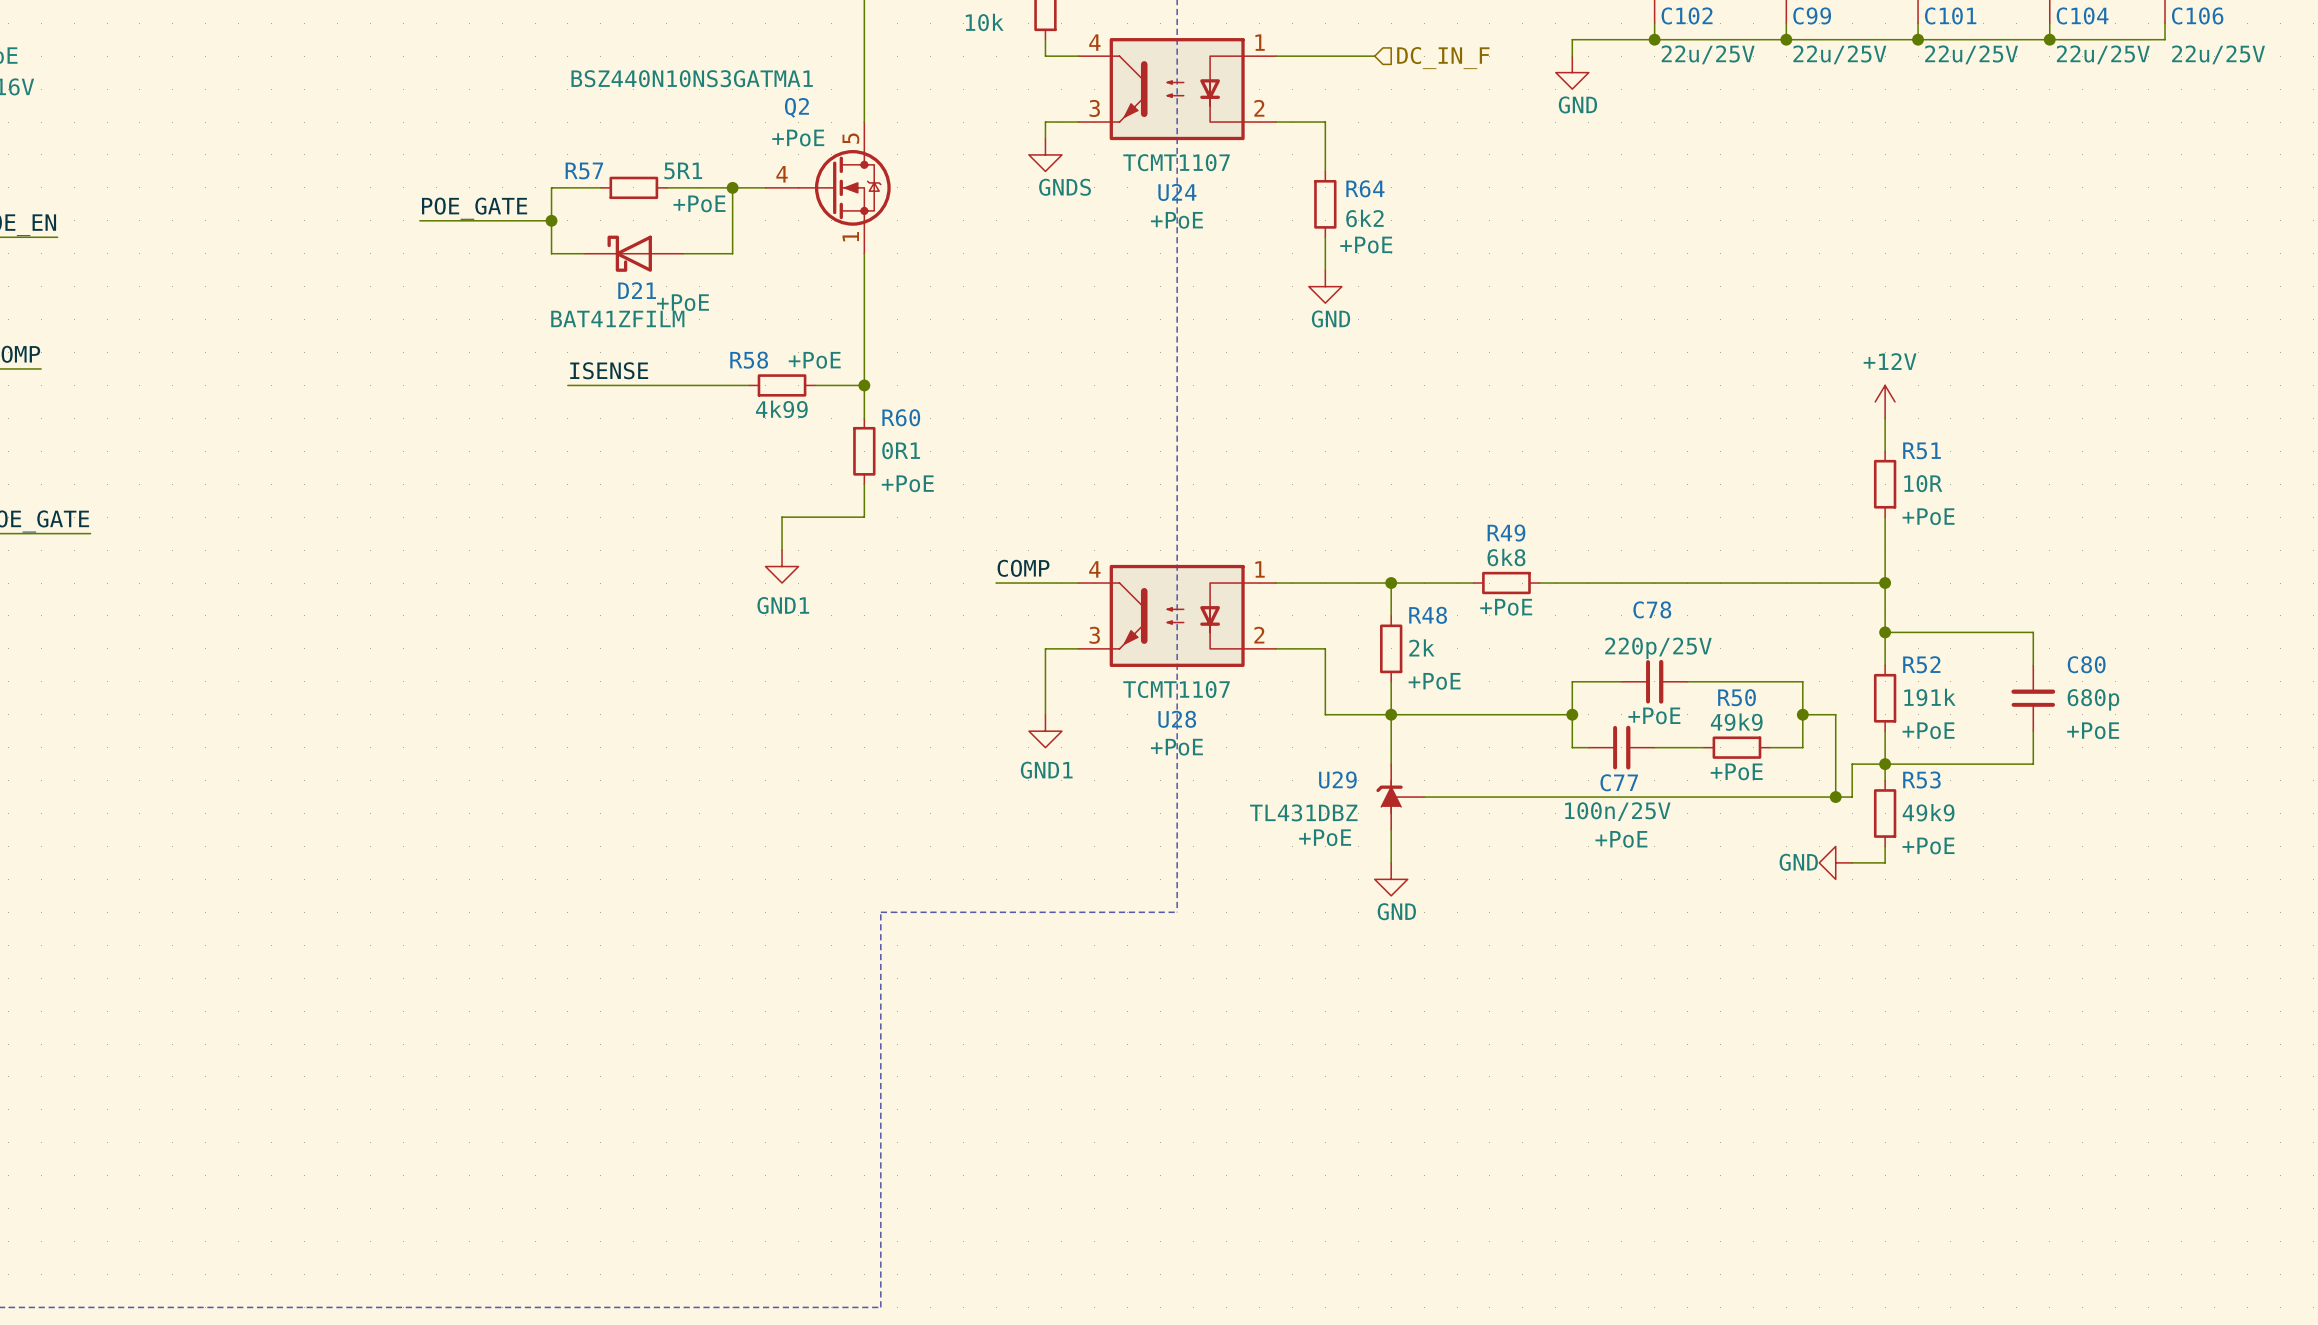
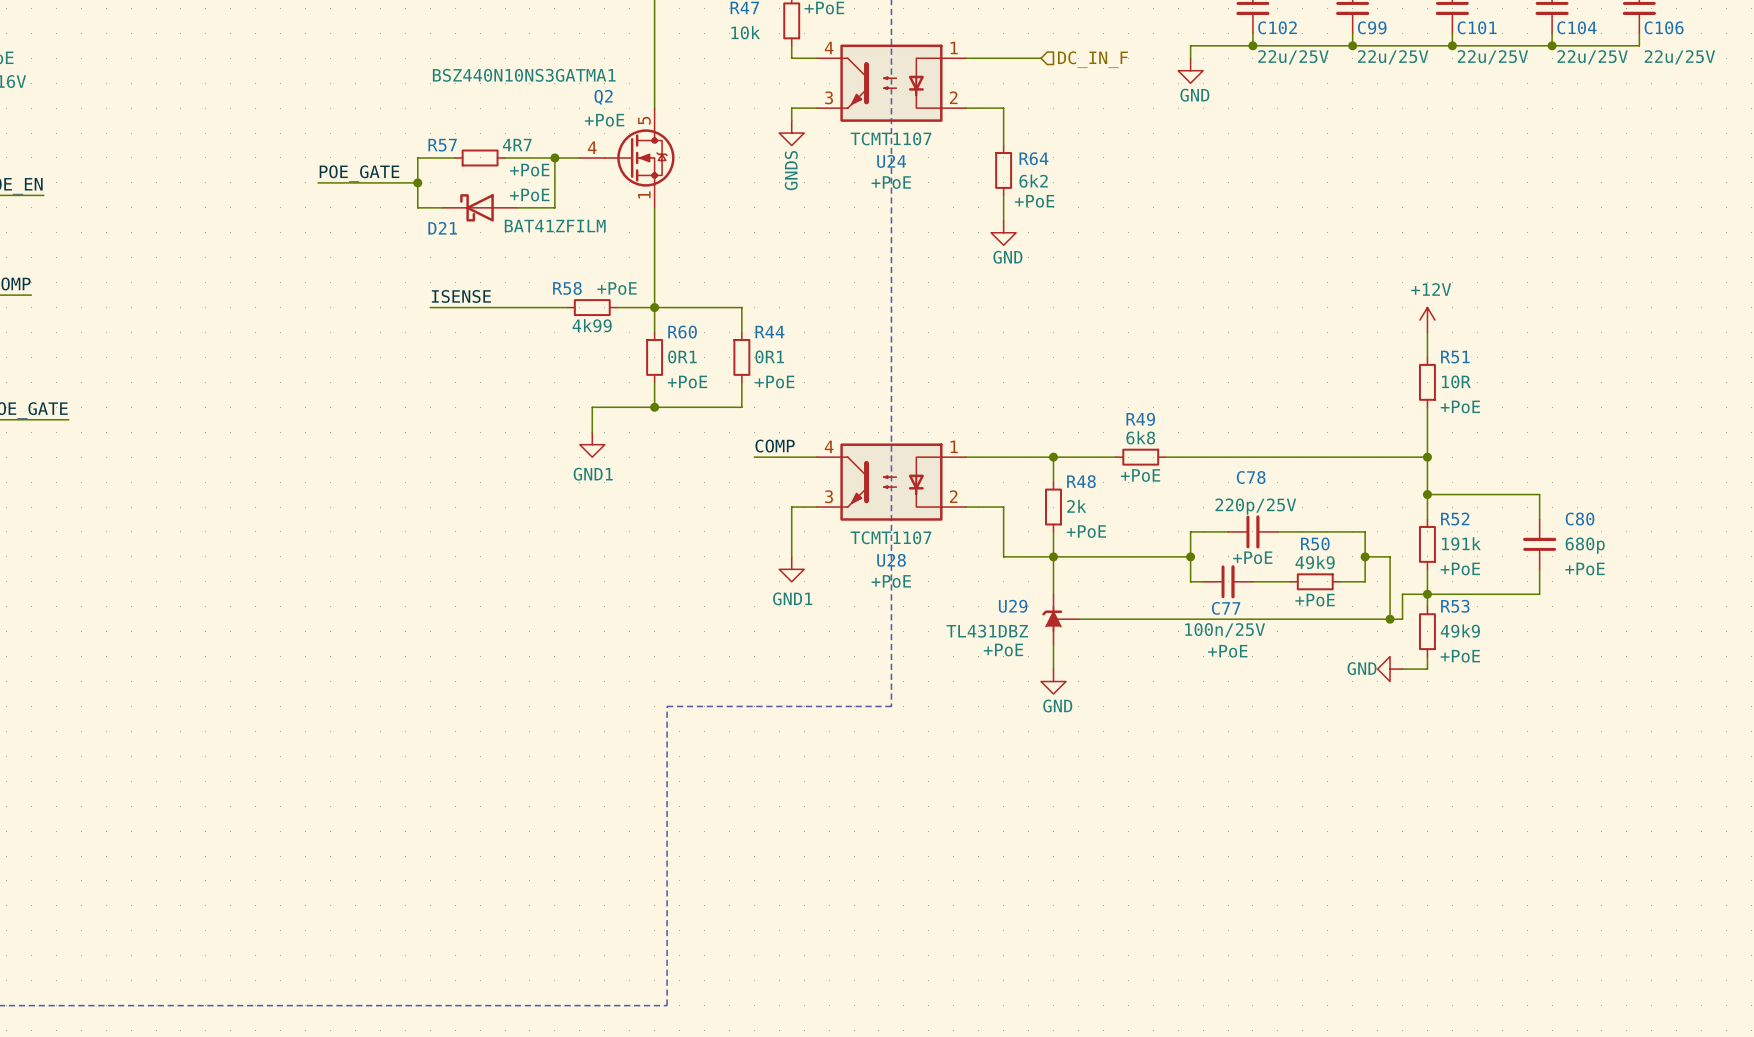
R57 value: 5R1 (683, 170) -> 4R7 (517, 145)
power symbol text rotation: 0° (1065, 187) -> 90° counterclockwise (791, 170)
D21 name position: D21 (637, 290) -> D21 (442, 228)
D21 text position: +PoE (683, 302) -> +PoE (529, 195)
D21 value position: BAT41ZFILM (617, 318) -> BAT41ZFILM (555, 226)
wire: none -> (654, 307) (741, 307) (741, 332)
R44: none -> 0R1 (741, 357)
wire: none -> (741, 382) (741, 407) (654, 407)
junction: none -> (654, 407)

